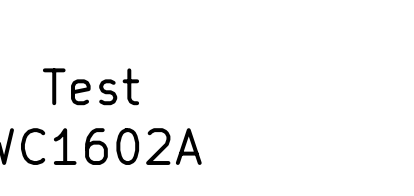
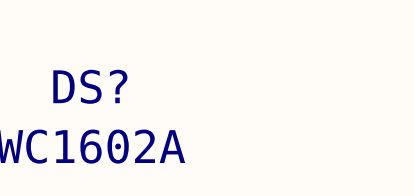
Test name: Test (90, 86) -> DS? (90, 86)

